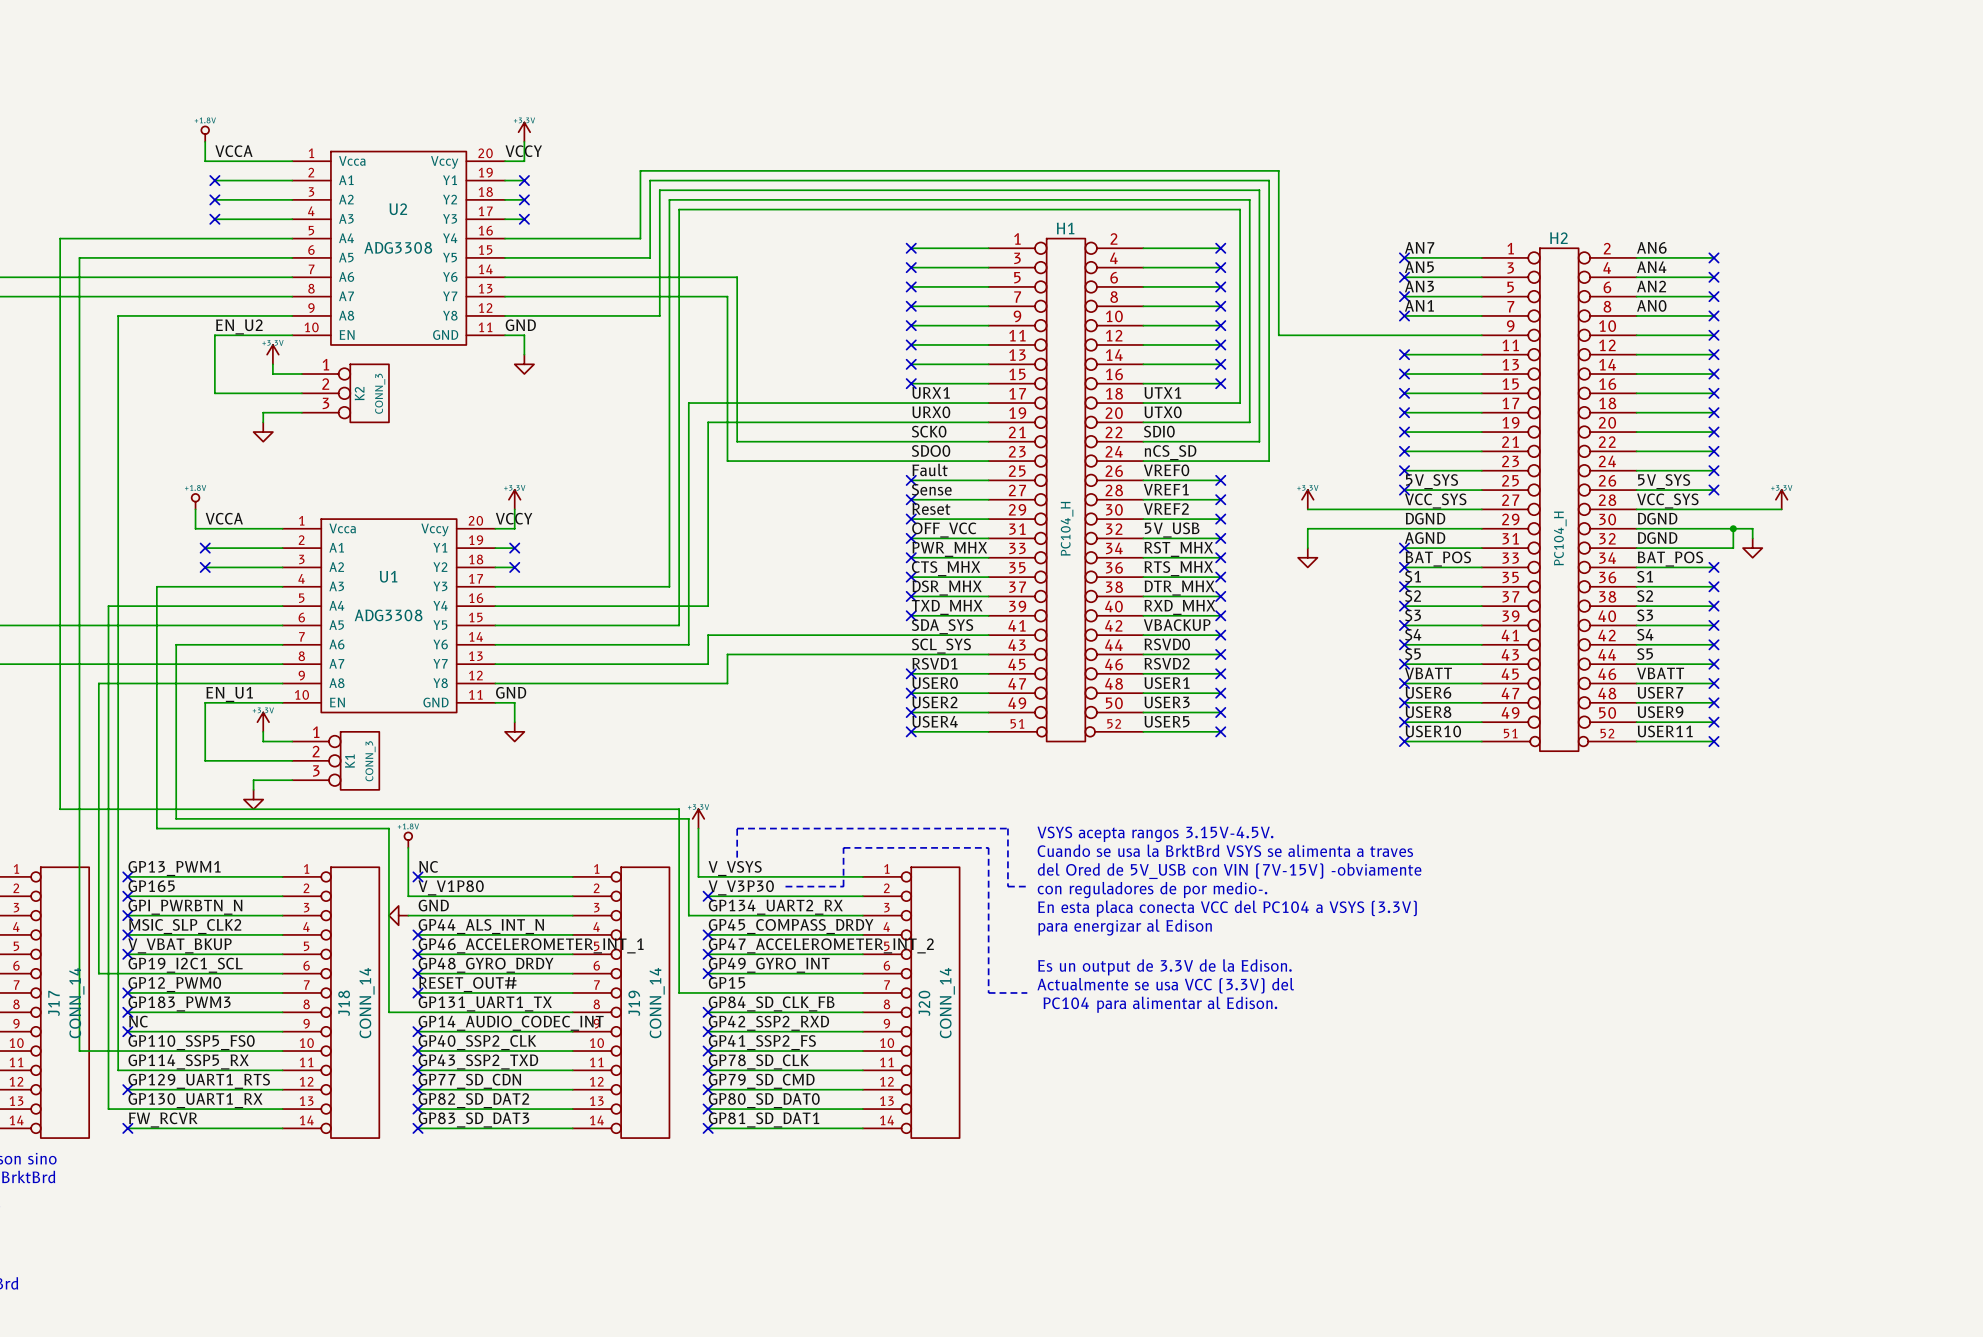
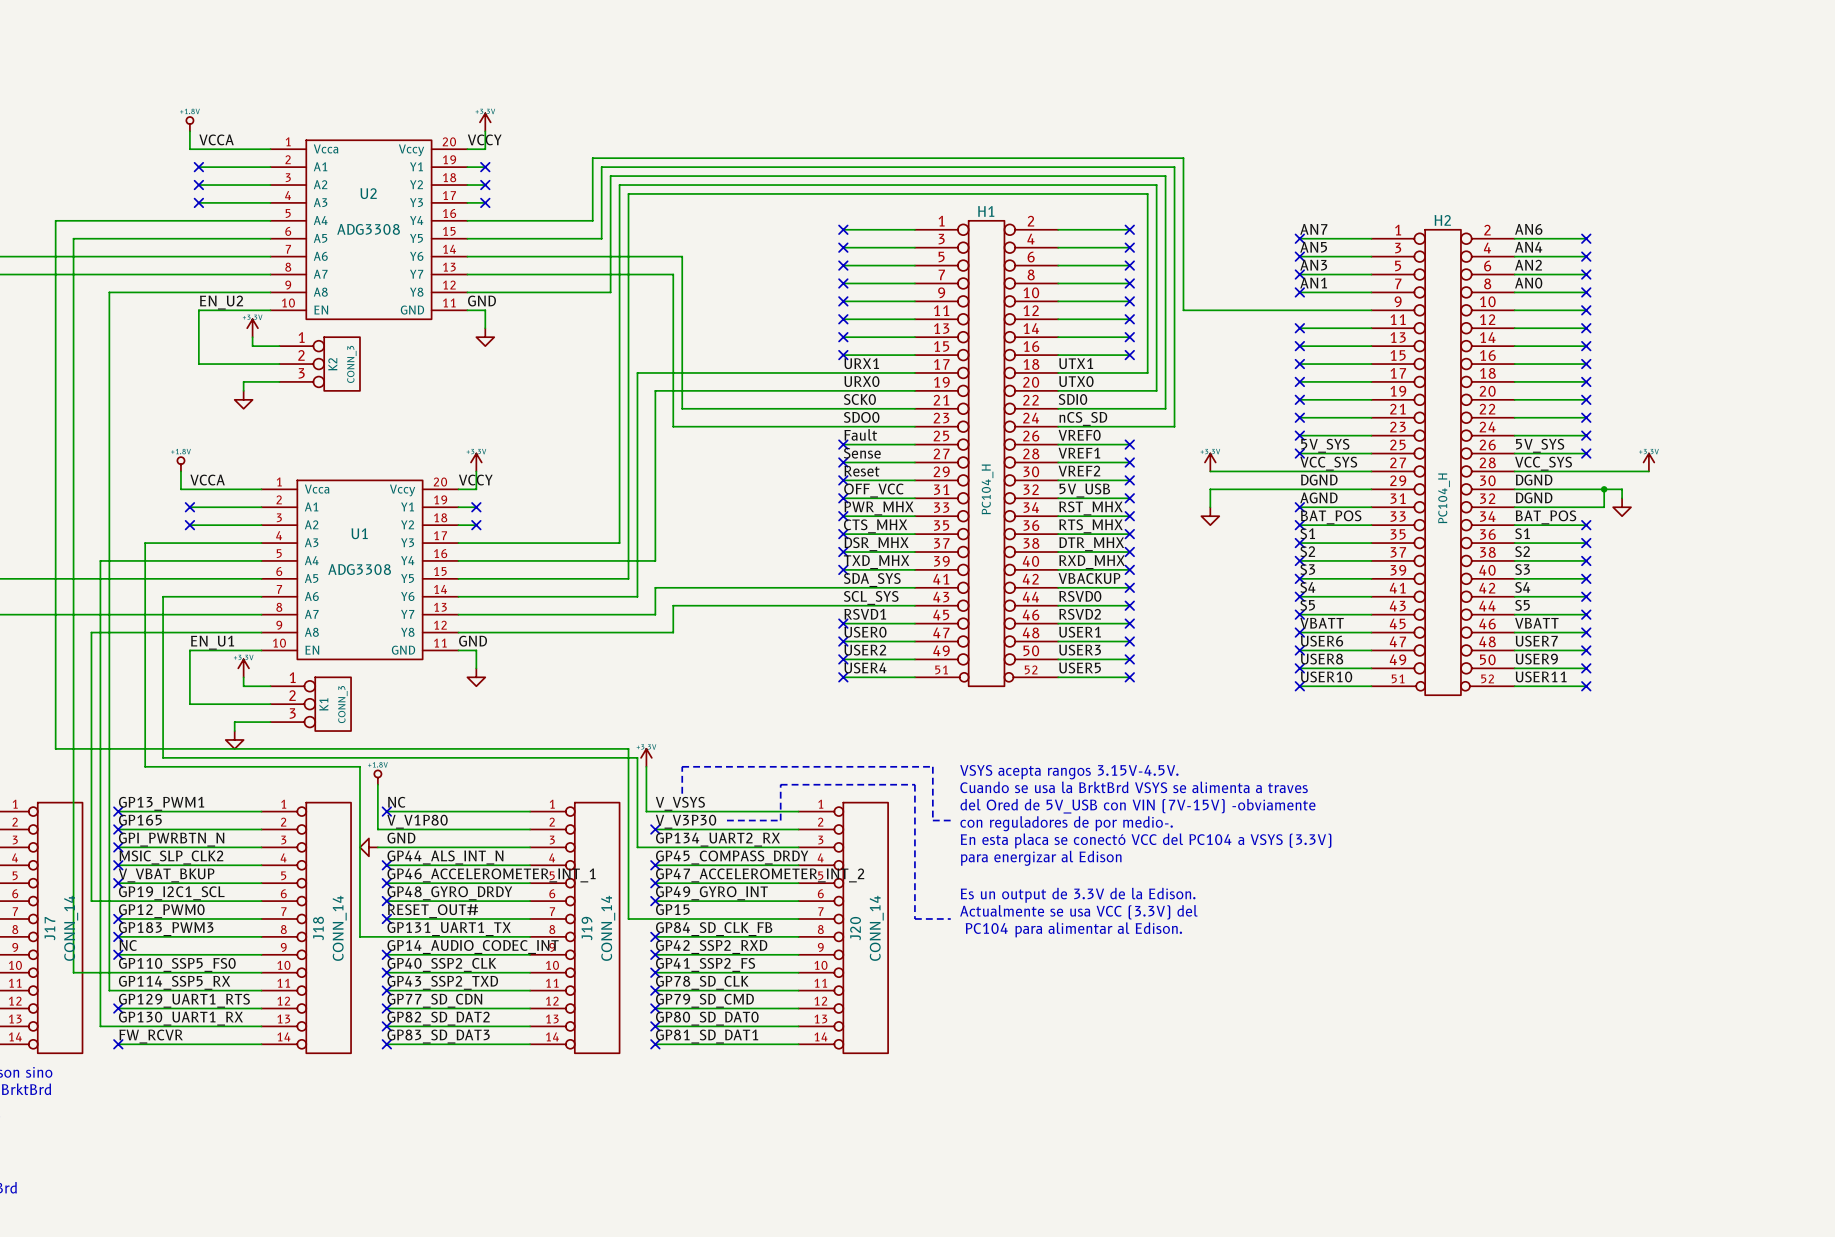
text: En esta placa conecta VCC del PC104 a VSYS (3.3V) (1227, 908) -> En esta placa se conectó VCC del PC104 a VSYS (3.3V) (1146, 840)

